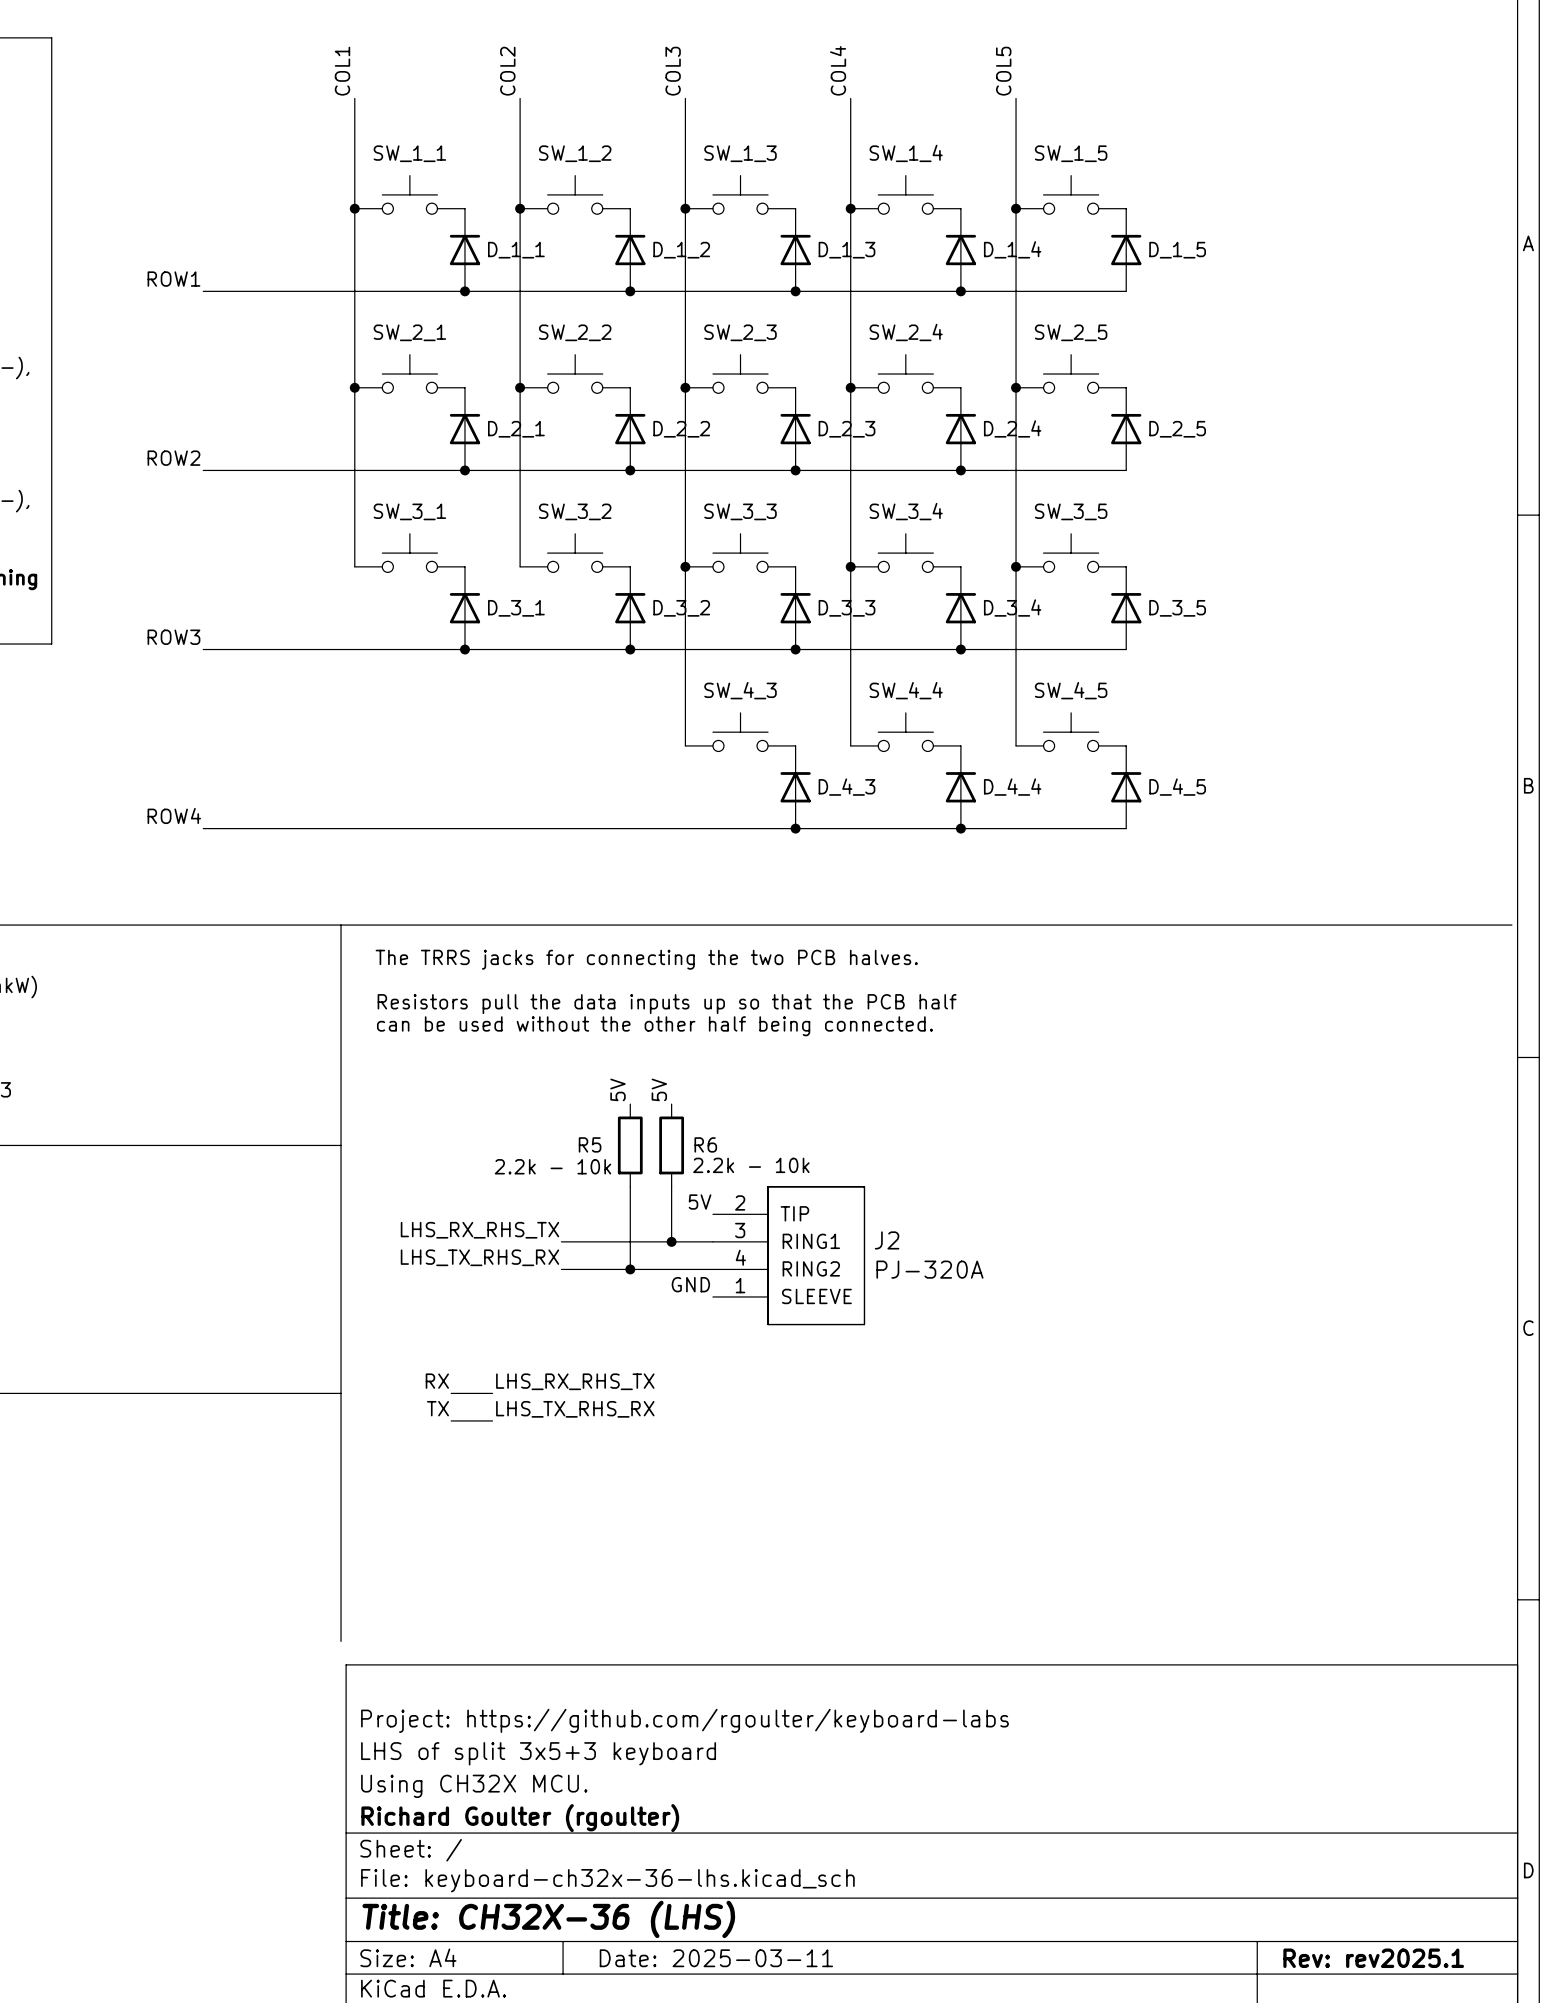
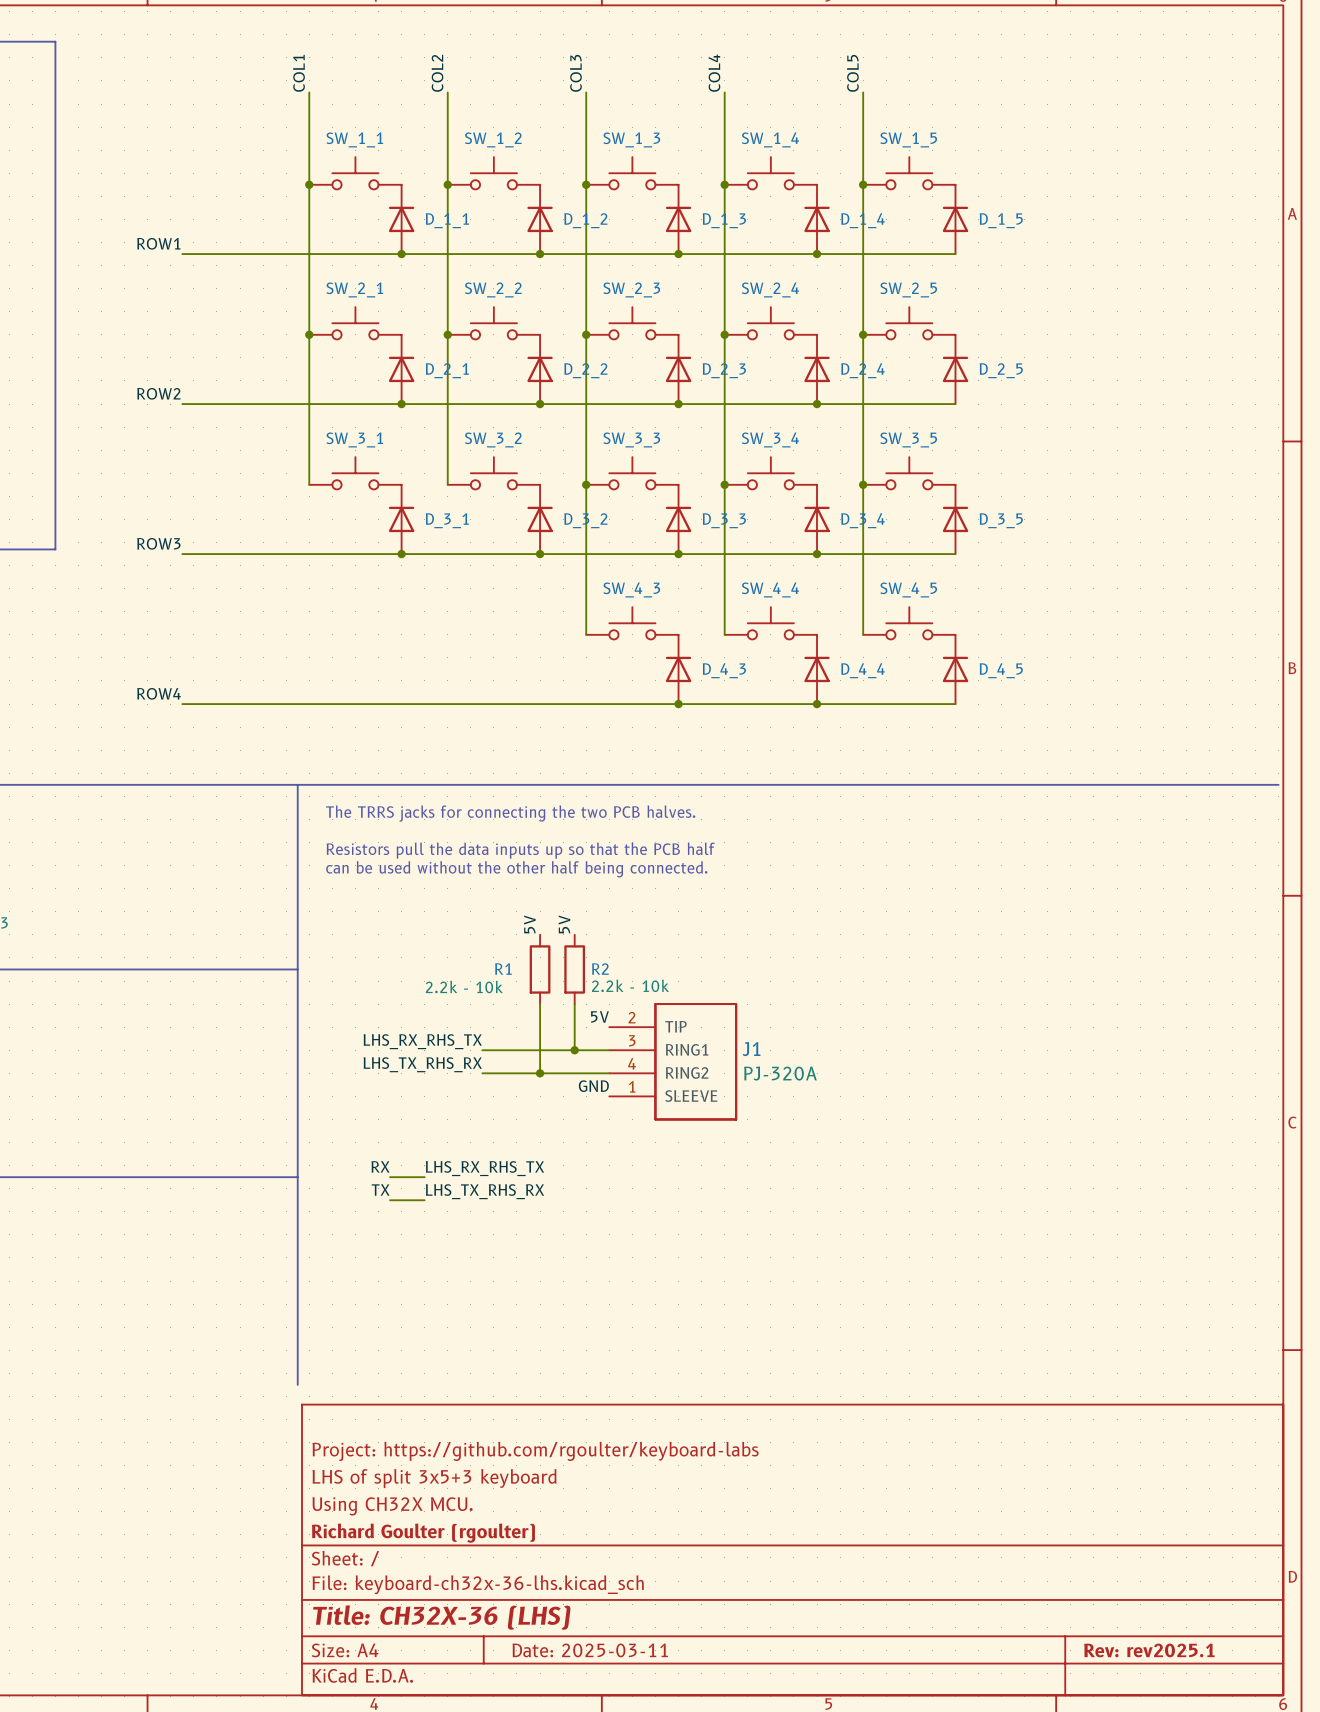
R5 name: R5 (590, 1144) -> R1 (503, 969)
R6 name: R6 (705, 1144) -> R2 (600, 969)
J2 name: J2 (887, 1240) -> J1 (751, 1049)

